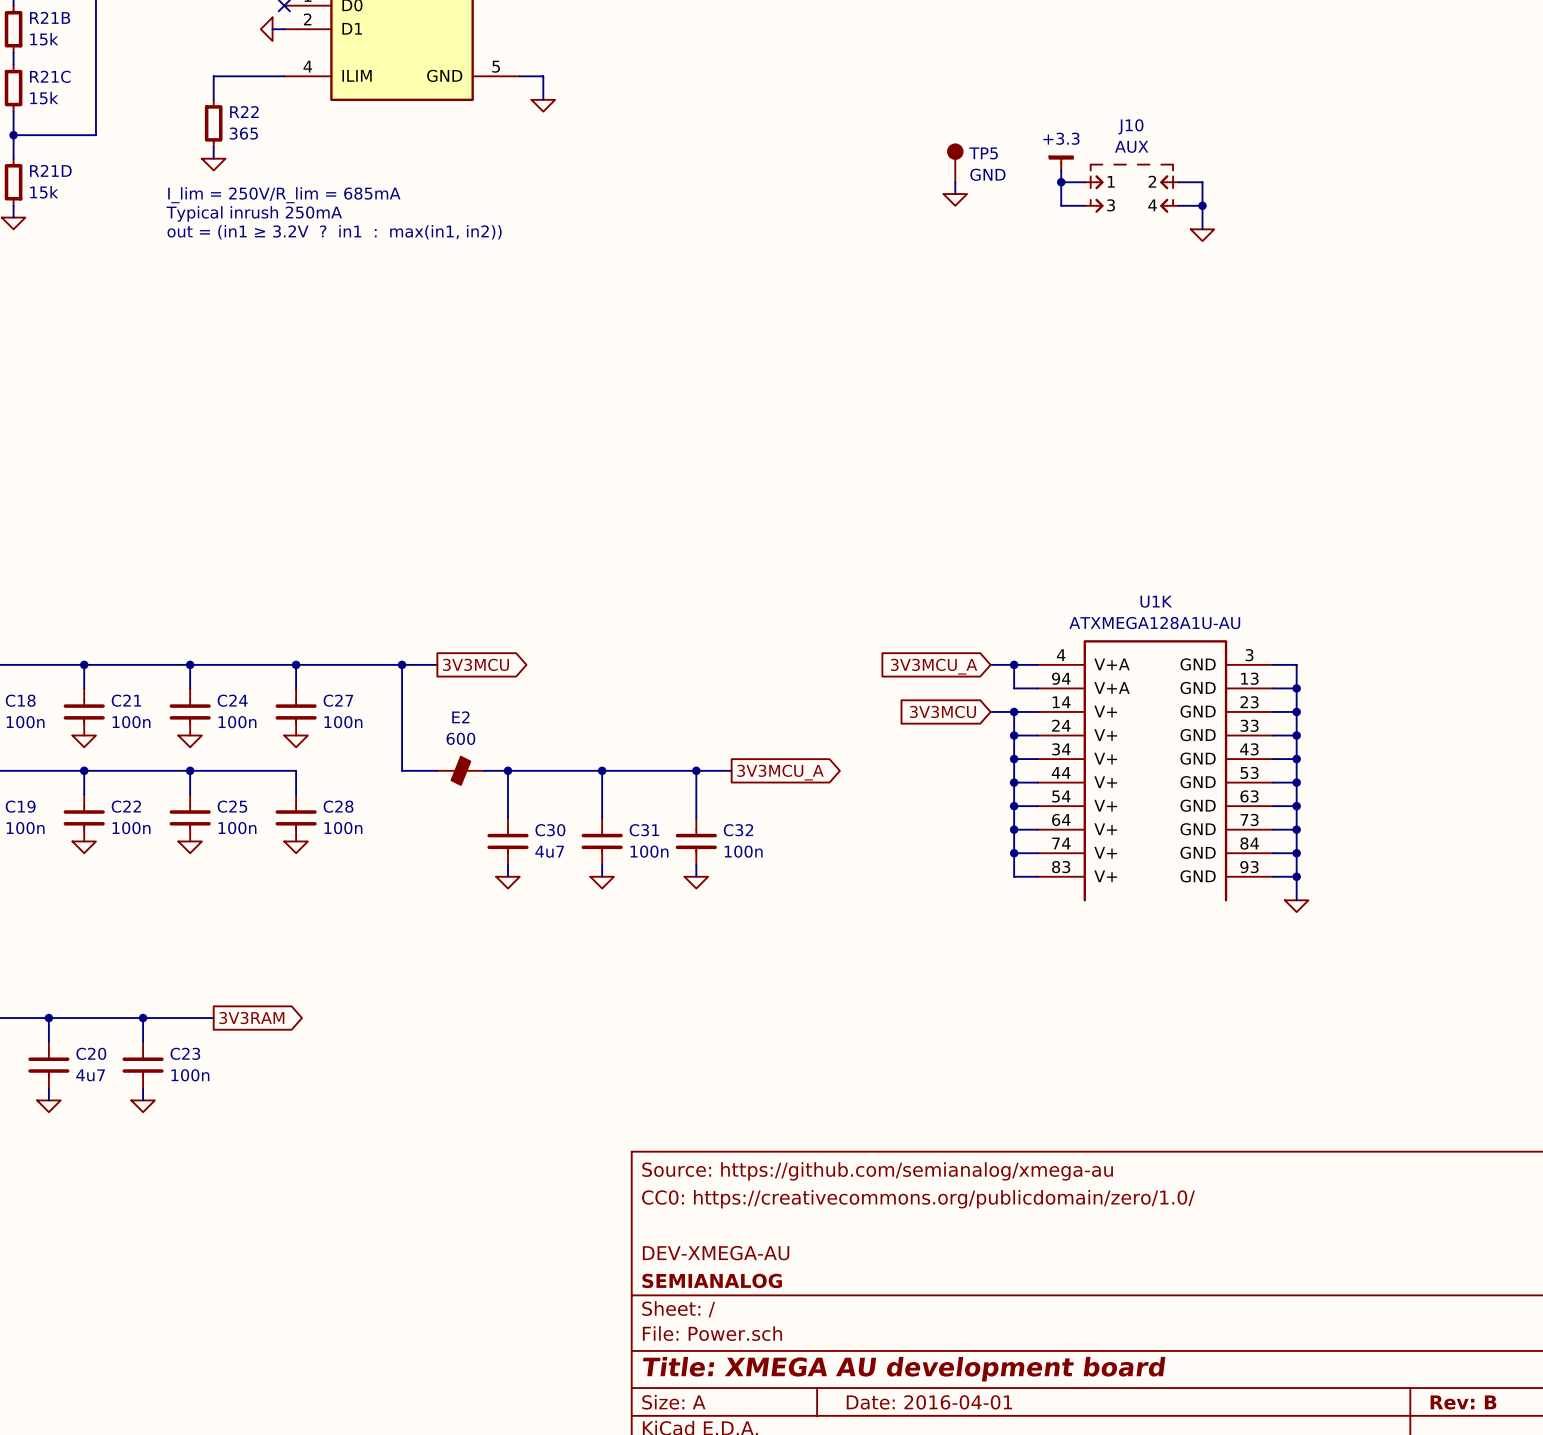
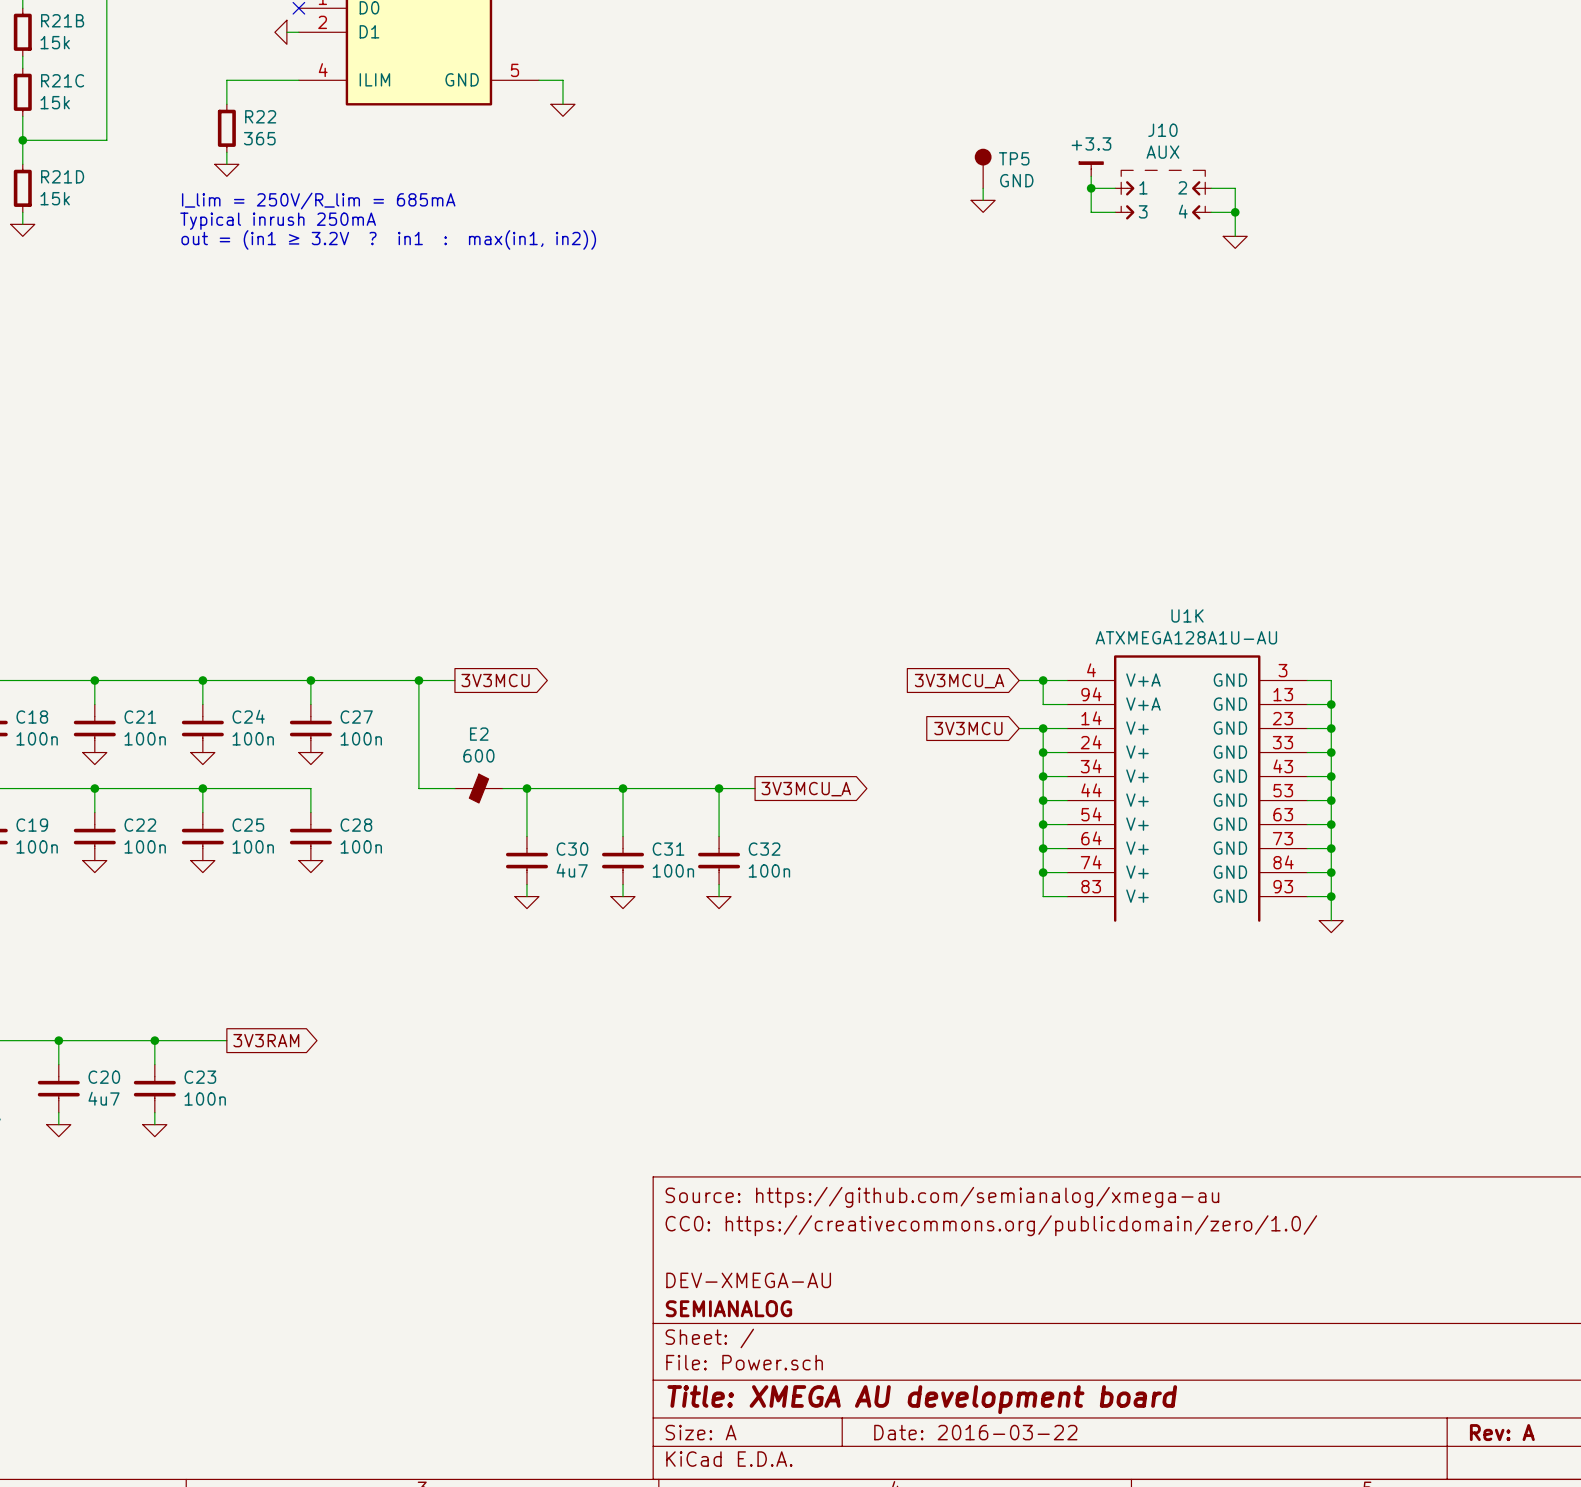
title block: Date: 2016-04-01 (929, 1402) -> Date: 2016-03-22 (975, 1432)
title block: Rev: B (1463, 1402) -> Rev: A (1502, 1432)

